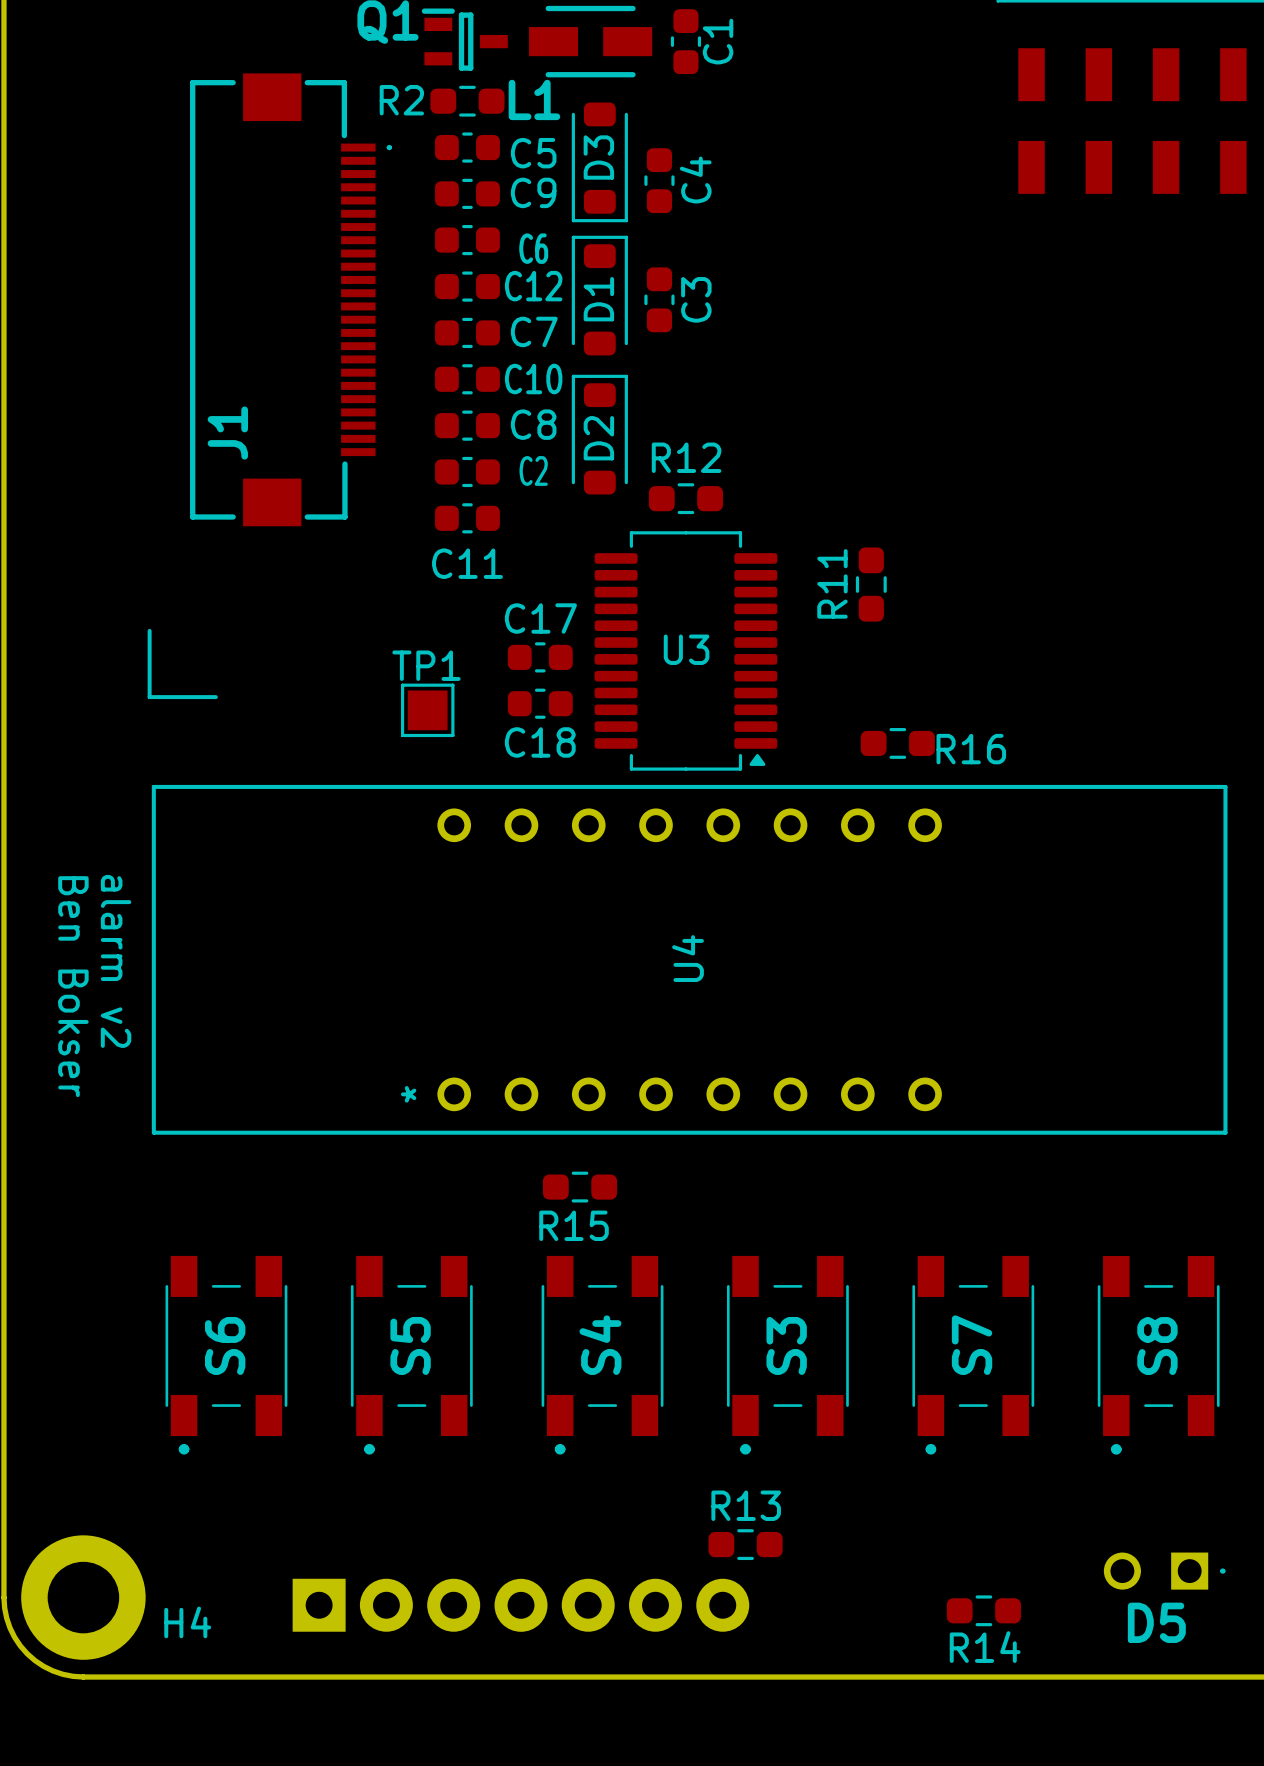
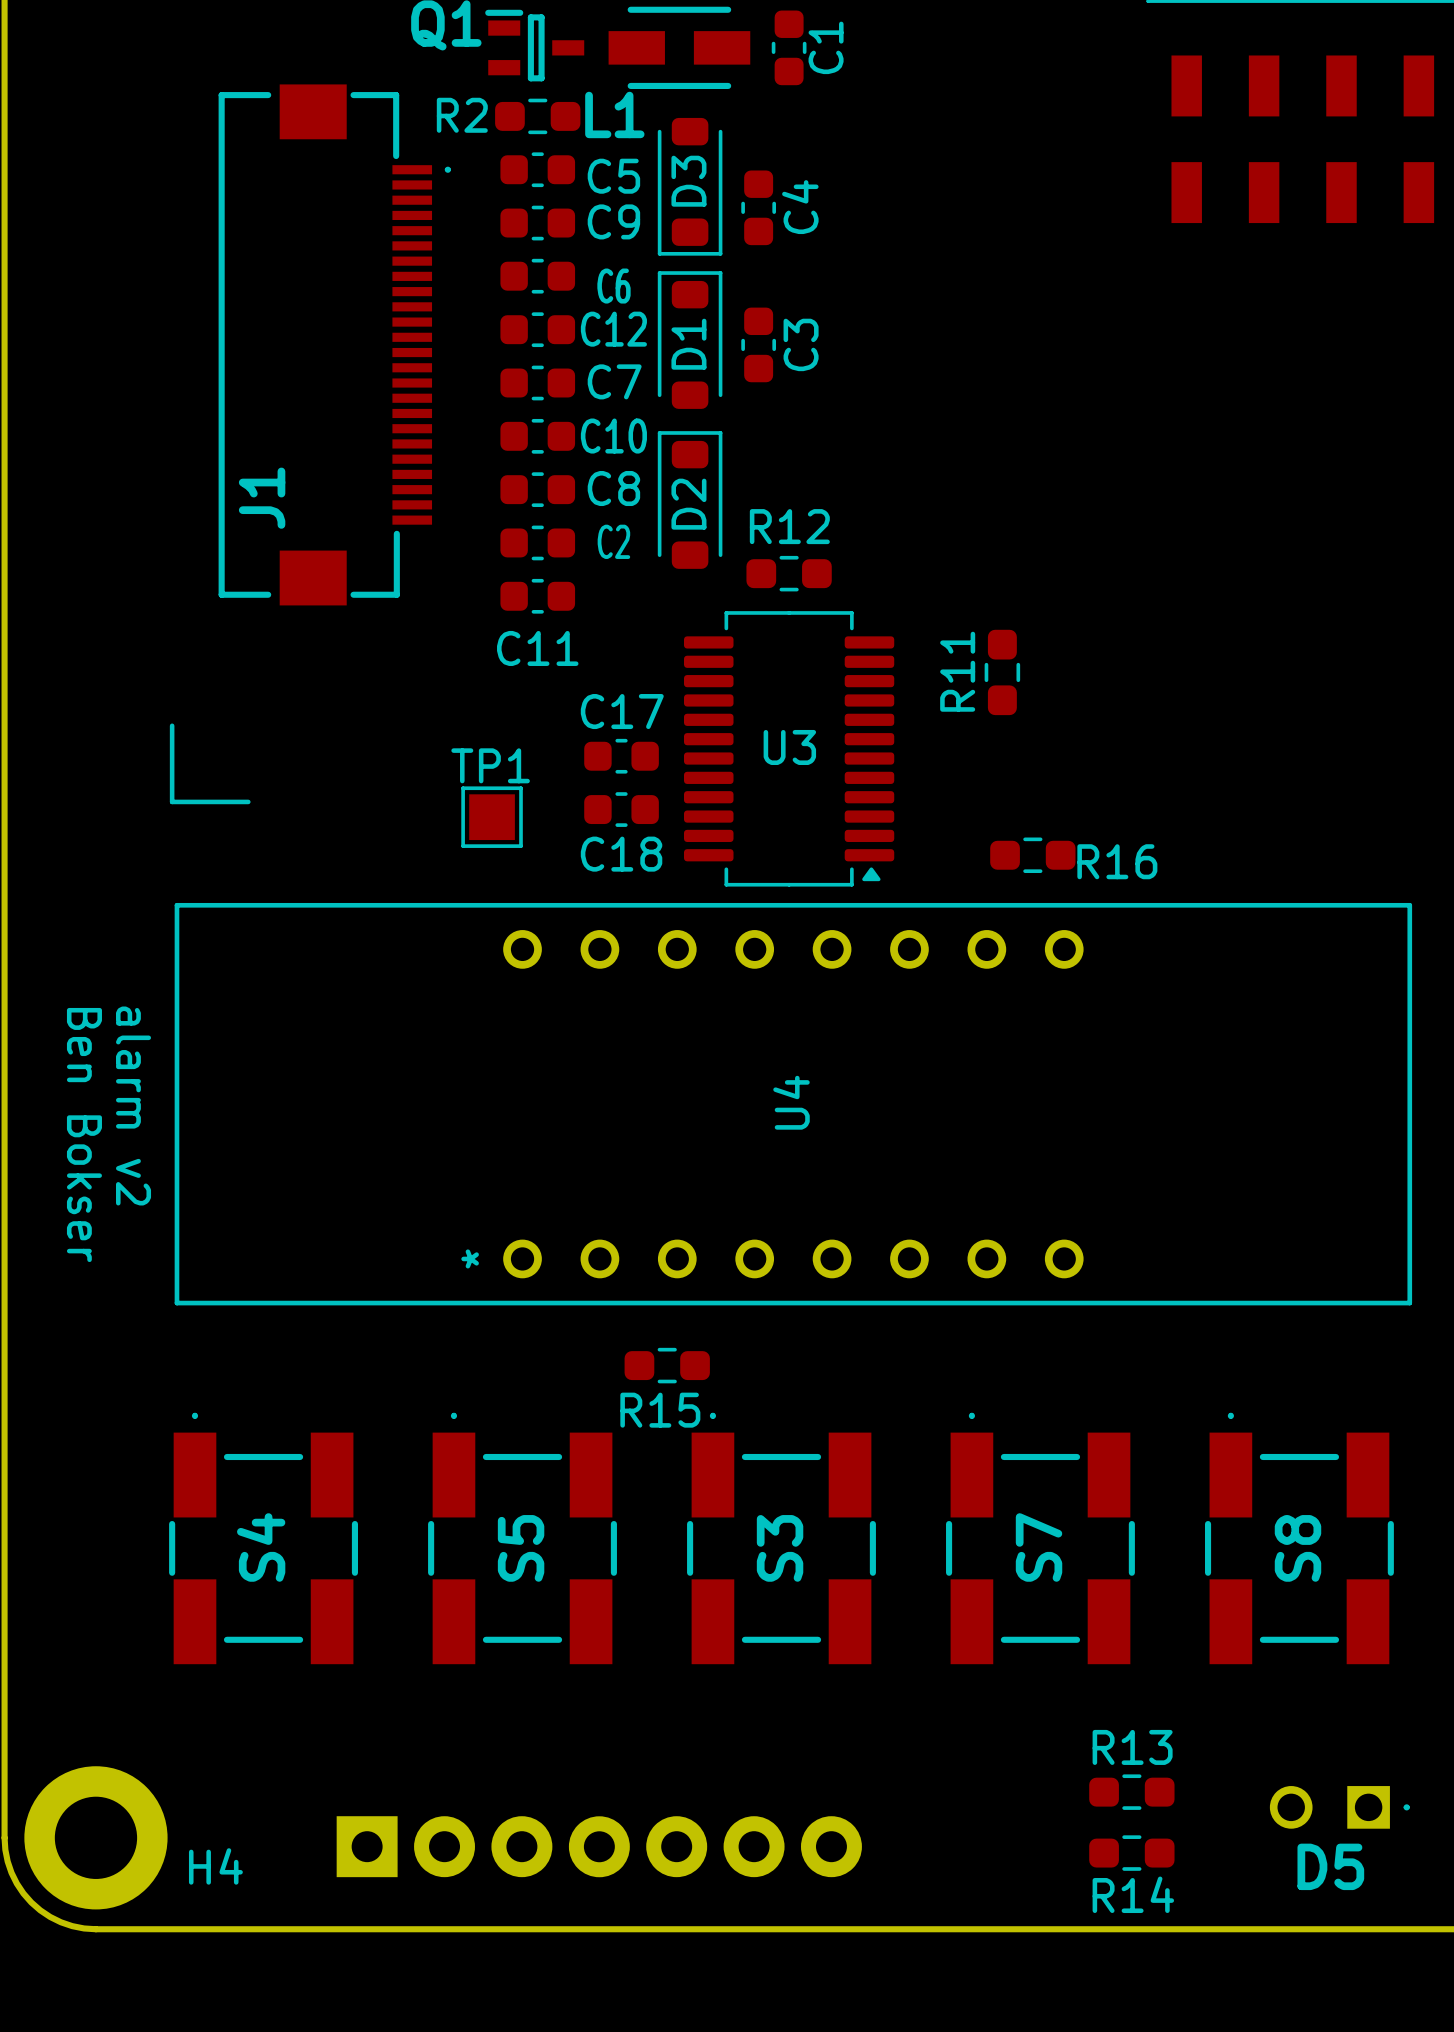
S5 footprint: [350, 1255, 473, 1455] -> [428, 1412, 617, 1665]
S4 footprint: [541, 1255, 664, 1455] -> [169, 1412, 358, 1665]
S3 footprint: [726, 1255, 849, 1455] -> [687, 1412, 876, 1665]
S7 footprint: [912, 1255, 1035, 1455] -> [946, 1412, 1135, 1665]
S8 footprint: [1097, 1255, 1220, 1455] -> [1204, 1412, 1394, 1665]
S6: (226, 1355) -> none
R13 position: (745, 1544) -> (1131, 1792)

